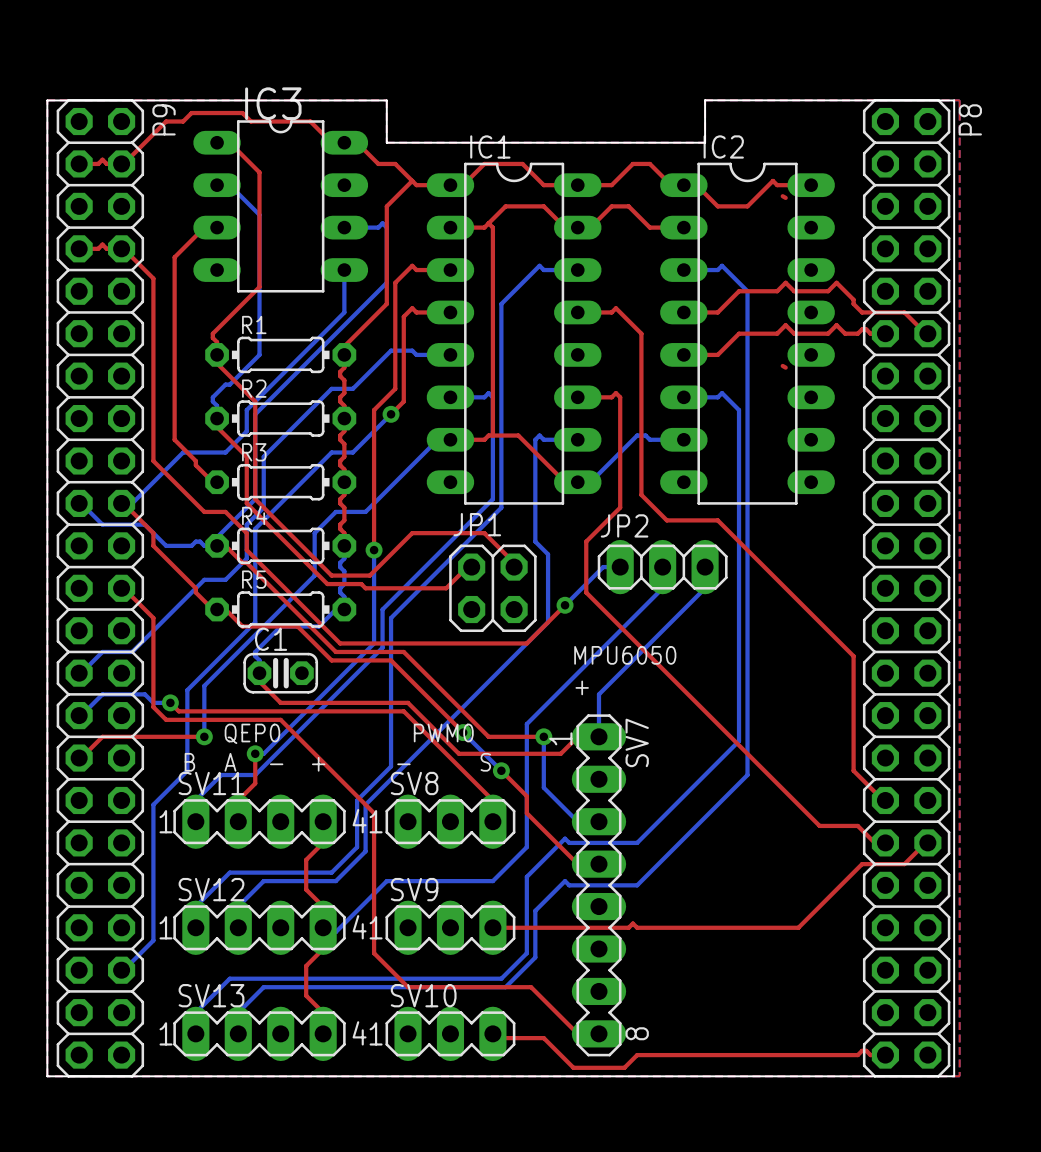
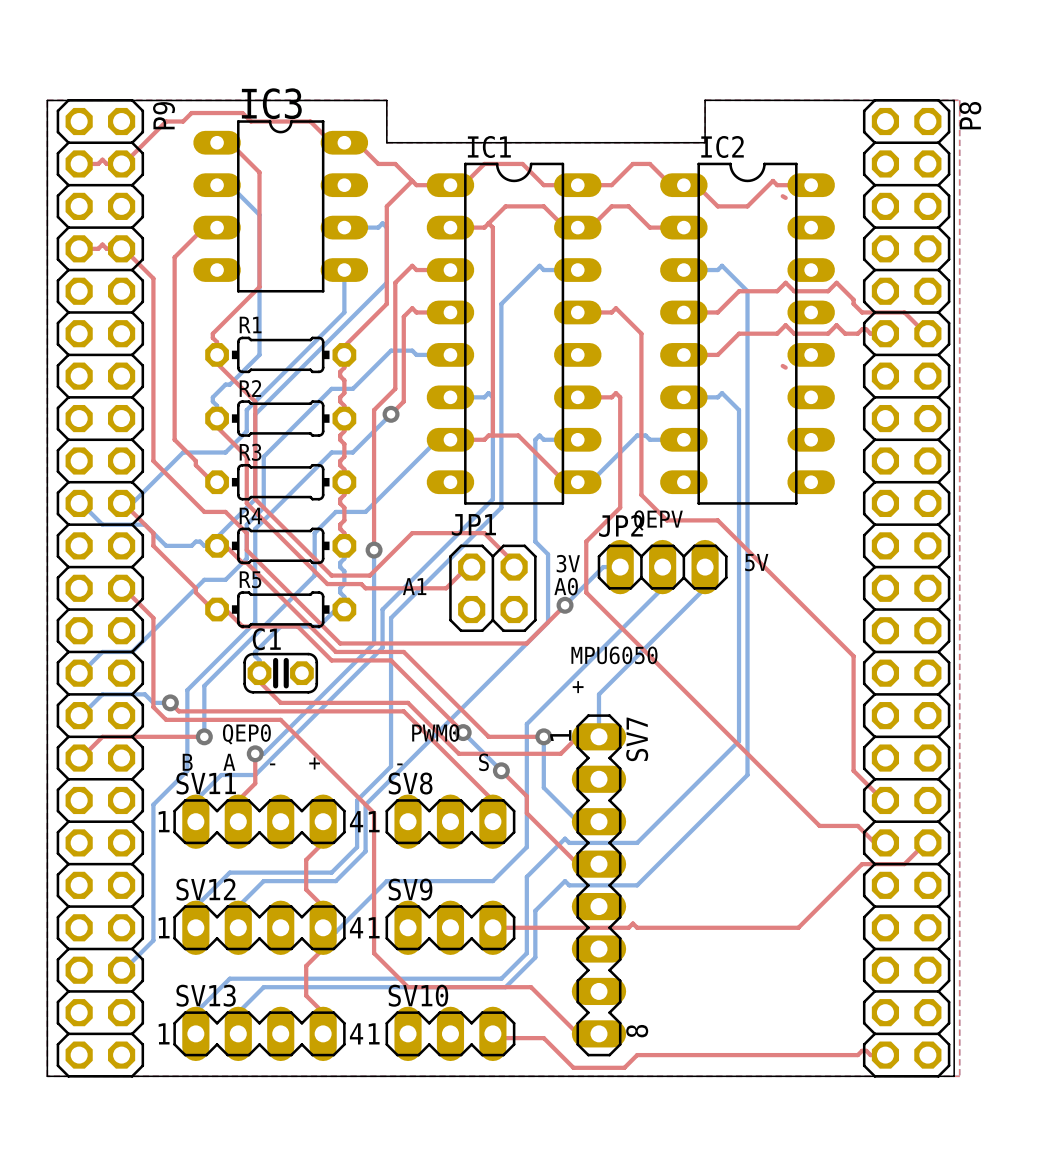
text: none -> QEPV (658, 520)
text: none -> 5V (756, 562)
text: none -> 3V (568, 563)
text: none -> A1 (414, 586)
text: none -> A0 (566, 586)

